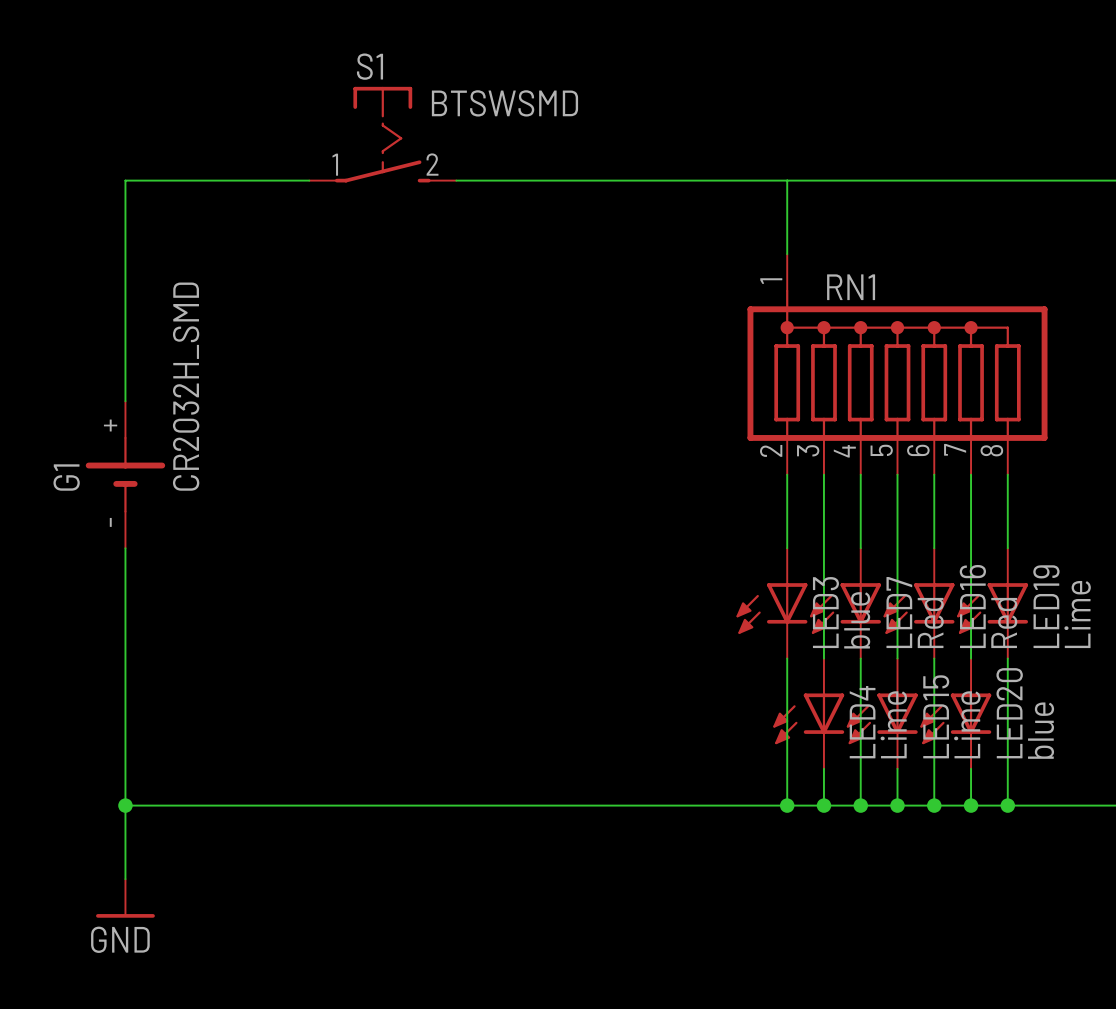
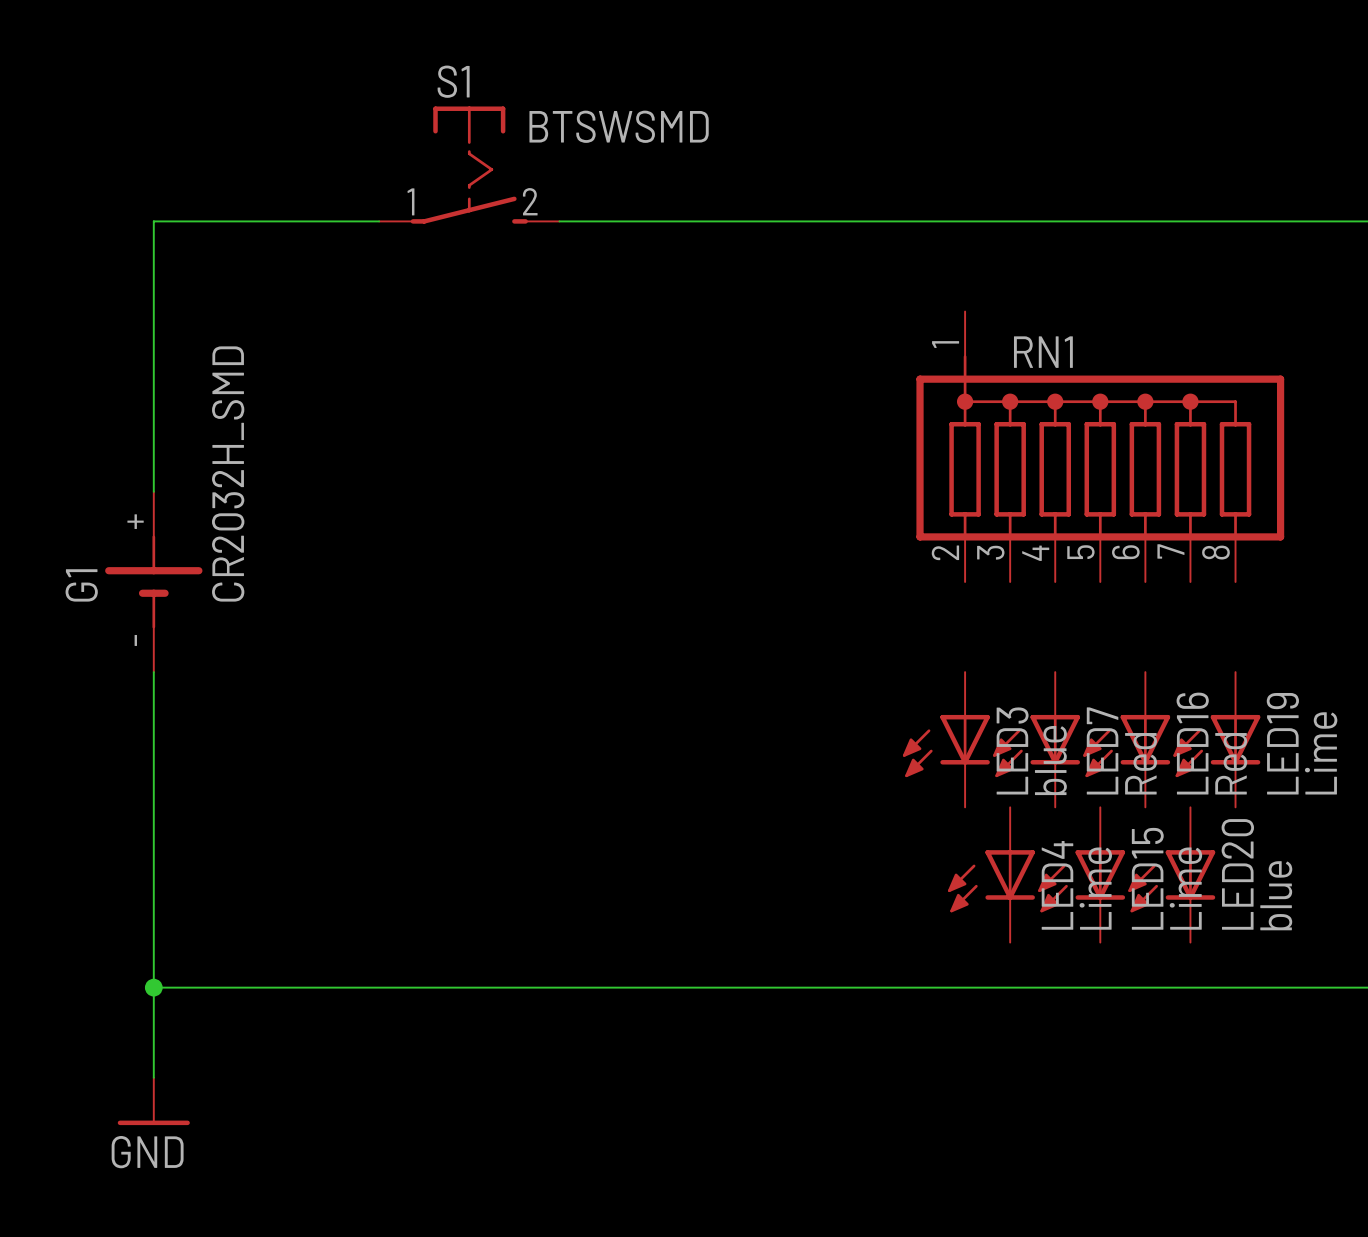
wire: (787, 180) (787, 254) -> none
wire: (787, 474) (787, 548) -> none
wire: (823, 474) (823, 658) -> none
wire: (860, 474) (860, 548) -> none
wire: (897, 474) (897, 658) -> none
wire: (934, 474) (934, 548) -> none
wire: (971, 474) (971, 658) -> none
wire: (1007, 474) (1007, 548) -> none
wire: (787, 658) (787, 805) -> none
wire: (860, 658) (860, 805) -> none
wire: (934, 658) (934, 805) -> none
wire: (1007, 658) (1007, 805) -> none
wire: (823, 768) (823, 805) -> none
wire: (897, 768) (897, 805) -> none
wire: (971, 768) (971, 805) -> none
junction: (787, 805) -> none
junction: (823, 805) -> none
junction: (860, 805) -> none
junction: (897, 805) -> none
junction: (934, 805) -> none
junction: (971, 805) -> none
junction: (1007, 805) -> none

